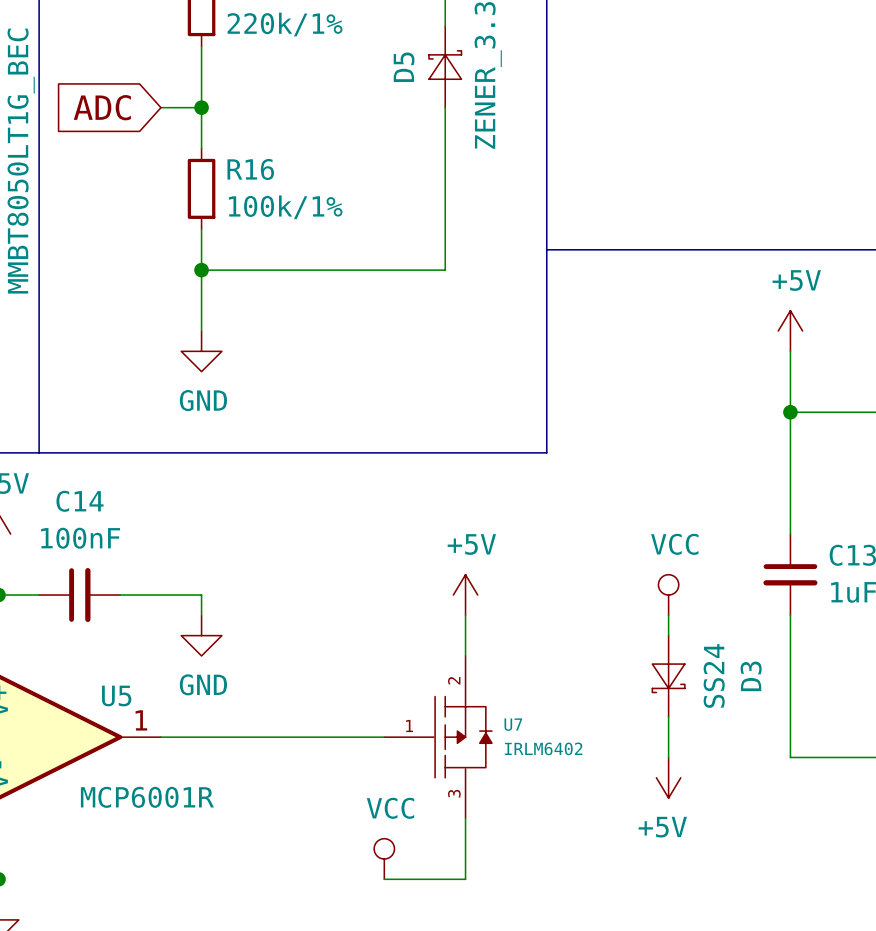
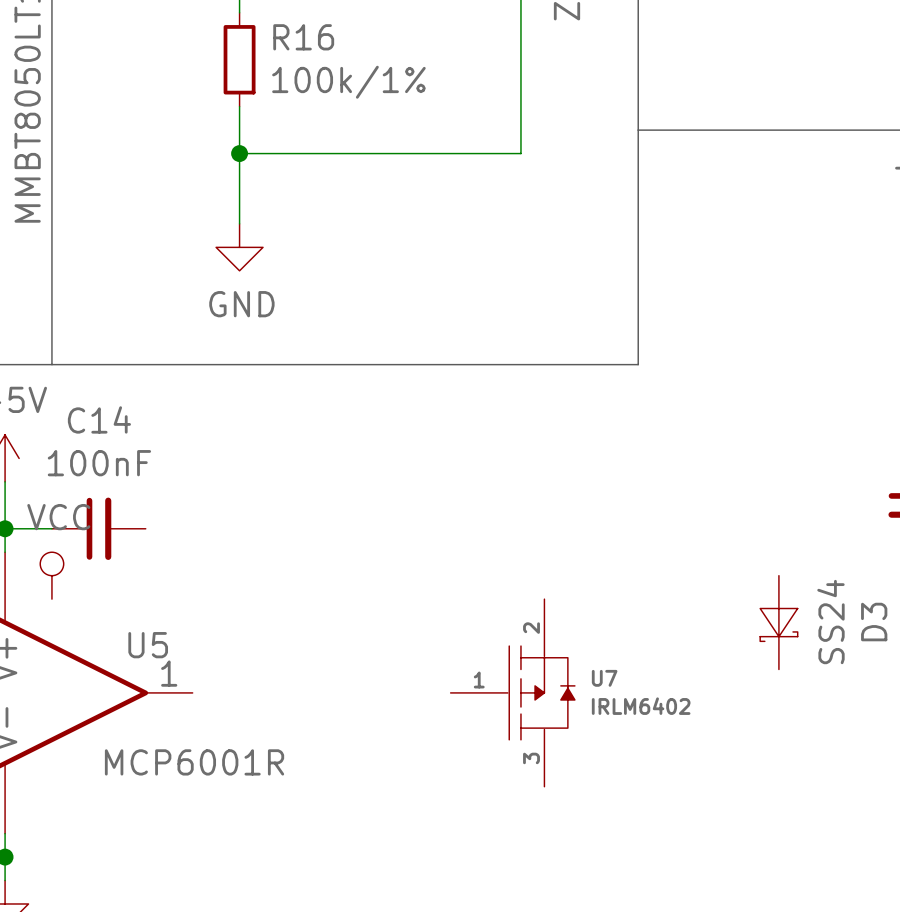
wire: (120, 595) (201, 595) (201, 615) -> none
power symbol: +5V (465, 595) -> none
power symbol: VCC (668, 595) -> none
wire: (465, 615) (465, 655) -> none
wire: (668, 615) (668, 635) -> none
power symbol: none -> VCC (51, 575)
power symbol: GND (201, 635) -> none
wire: (668, 716) (668, 757) -> none
wire: (160, 737) (384, 737) -> none
power symbol: +5V (668, 777) -> none
wire: (465, 818) (465, 879) (384, 879) -> none
power symbol: VCC (384, 859) -> none

